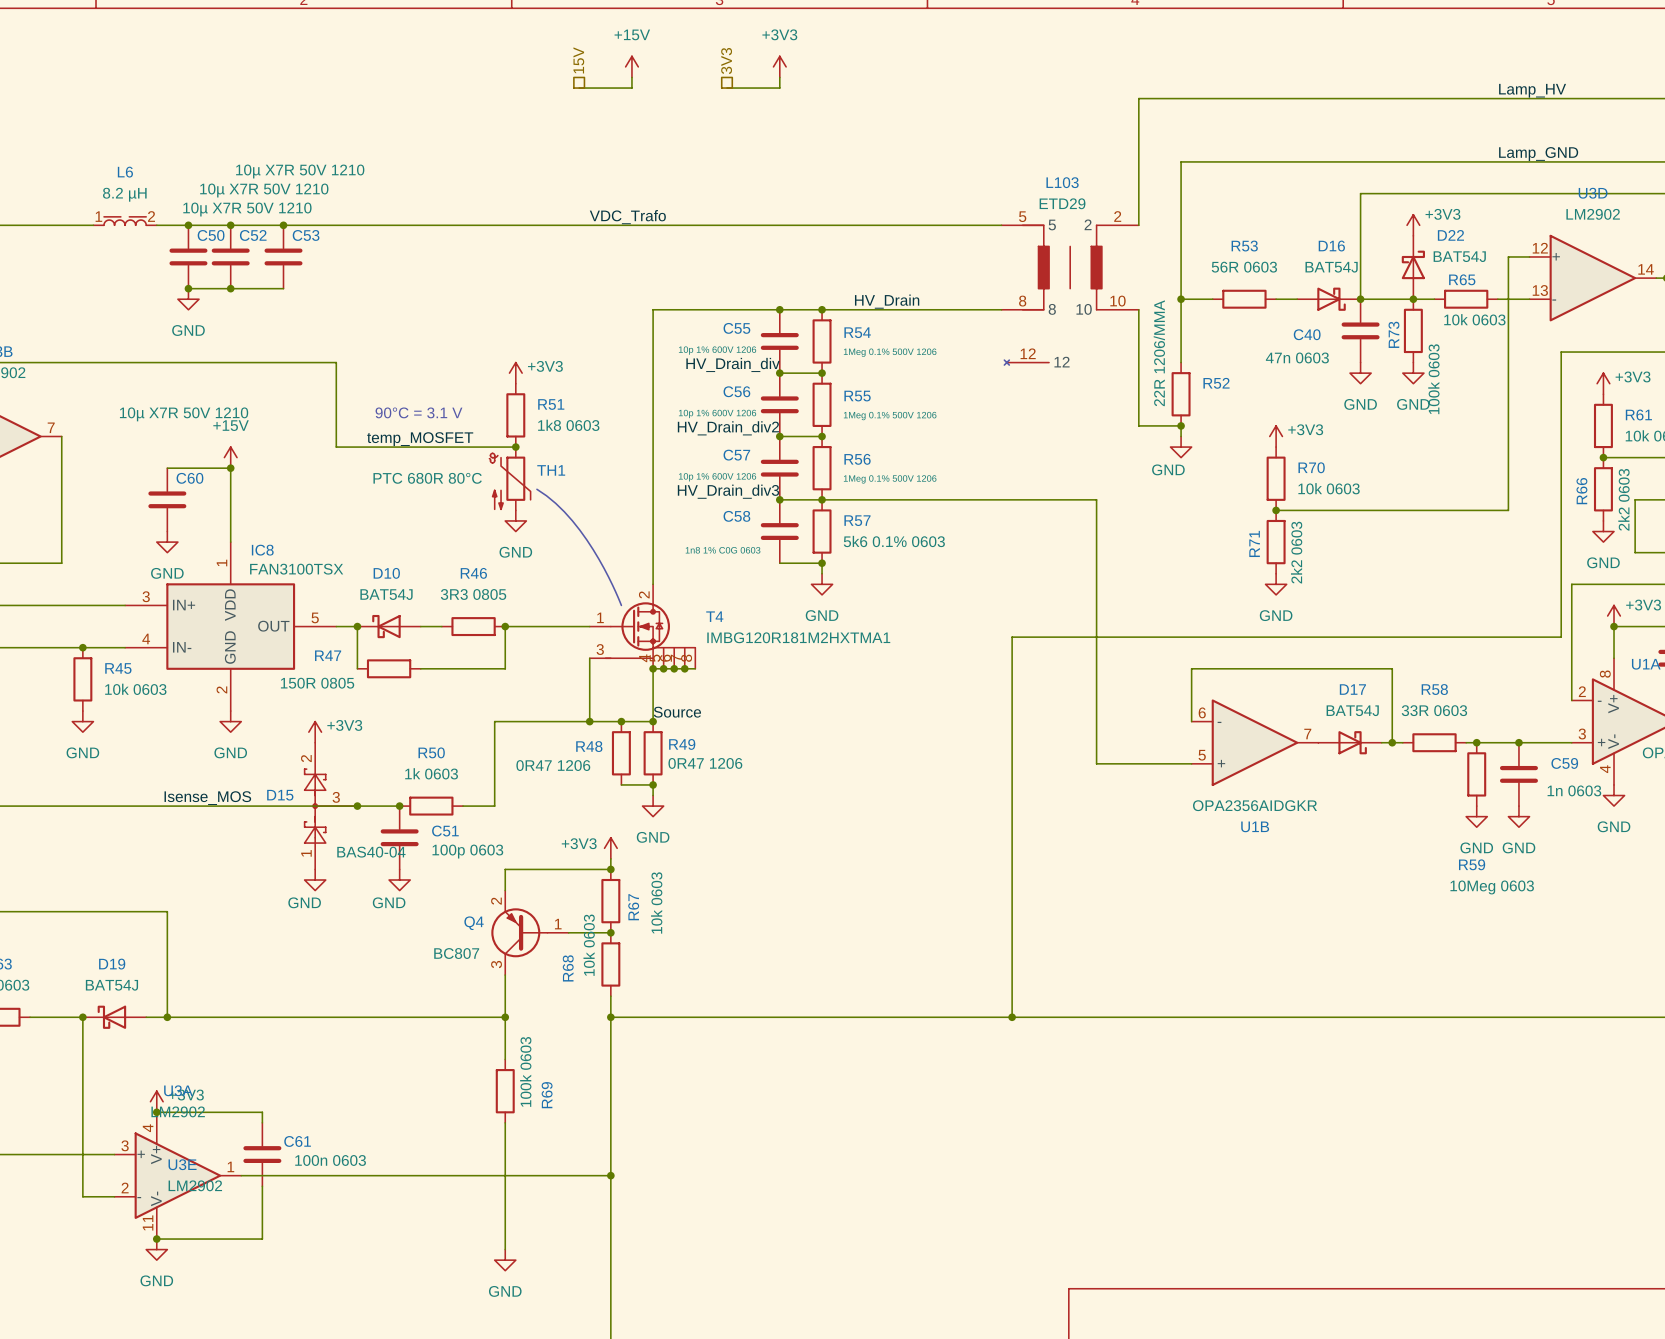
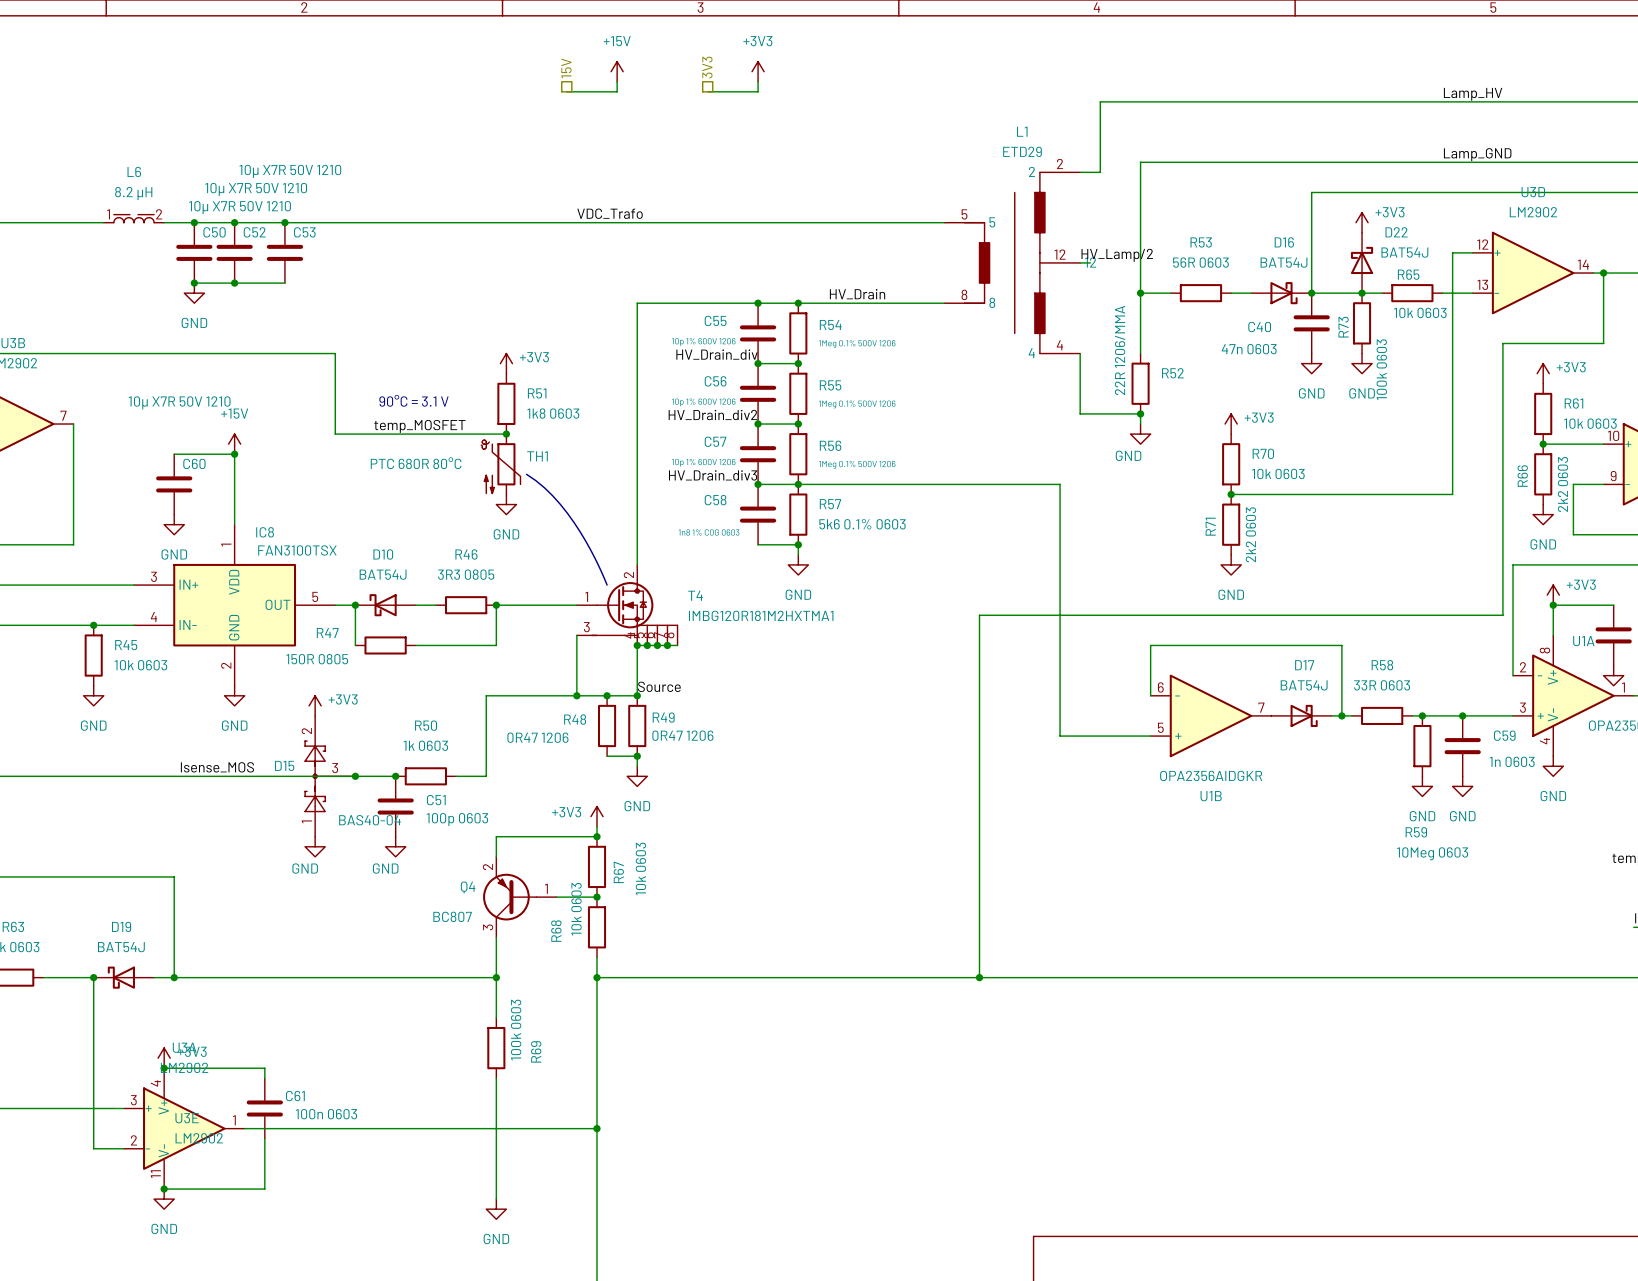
wire: (1138, 172) (1138, 225) -> (1100, 172) (1080, 172)
label: none -> HV_Lamp/2 (1117, 255)
L1: none -> ETD29 (1012, 262)
wire: none -> (1080, 262) (1090, 262)
L103: ETD29 (1070, 295) -> none
wire: (1138, 309) (1138, 425) -> (1080, 353) (1080, 413) (1100, 413)

